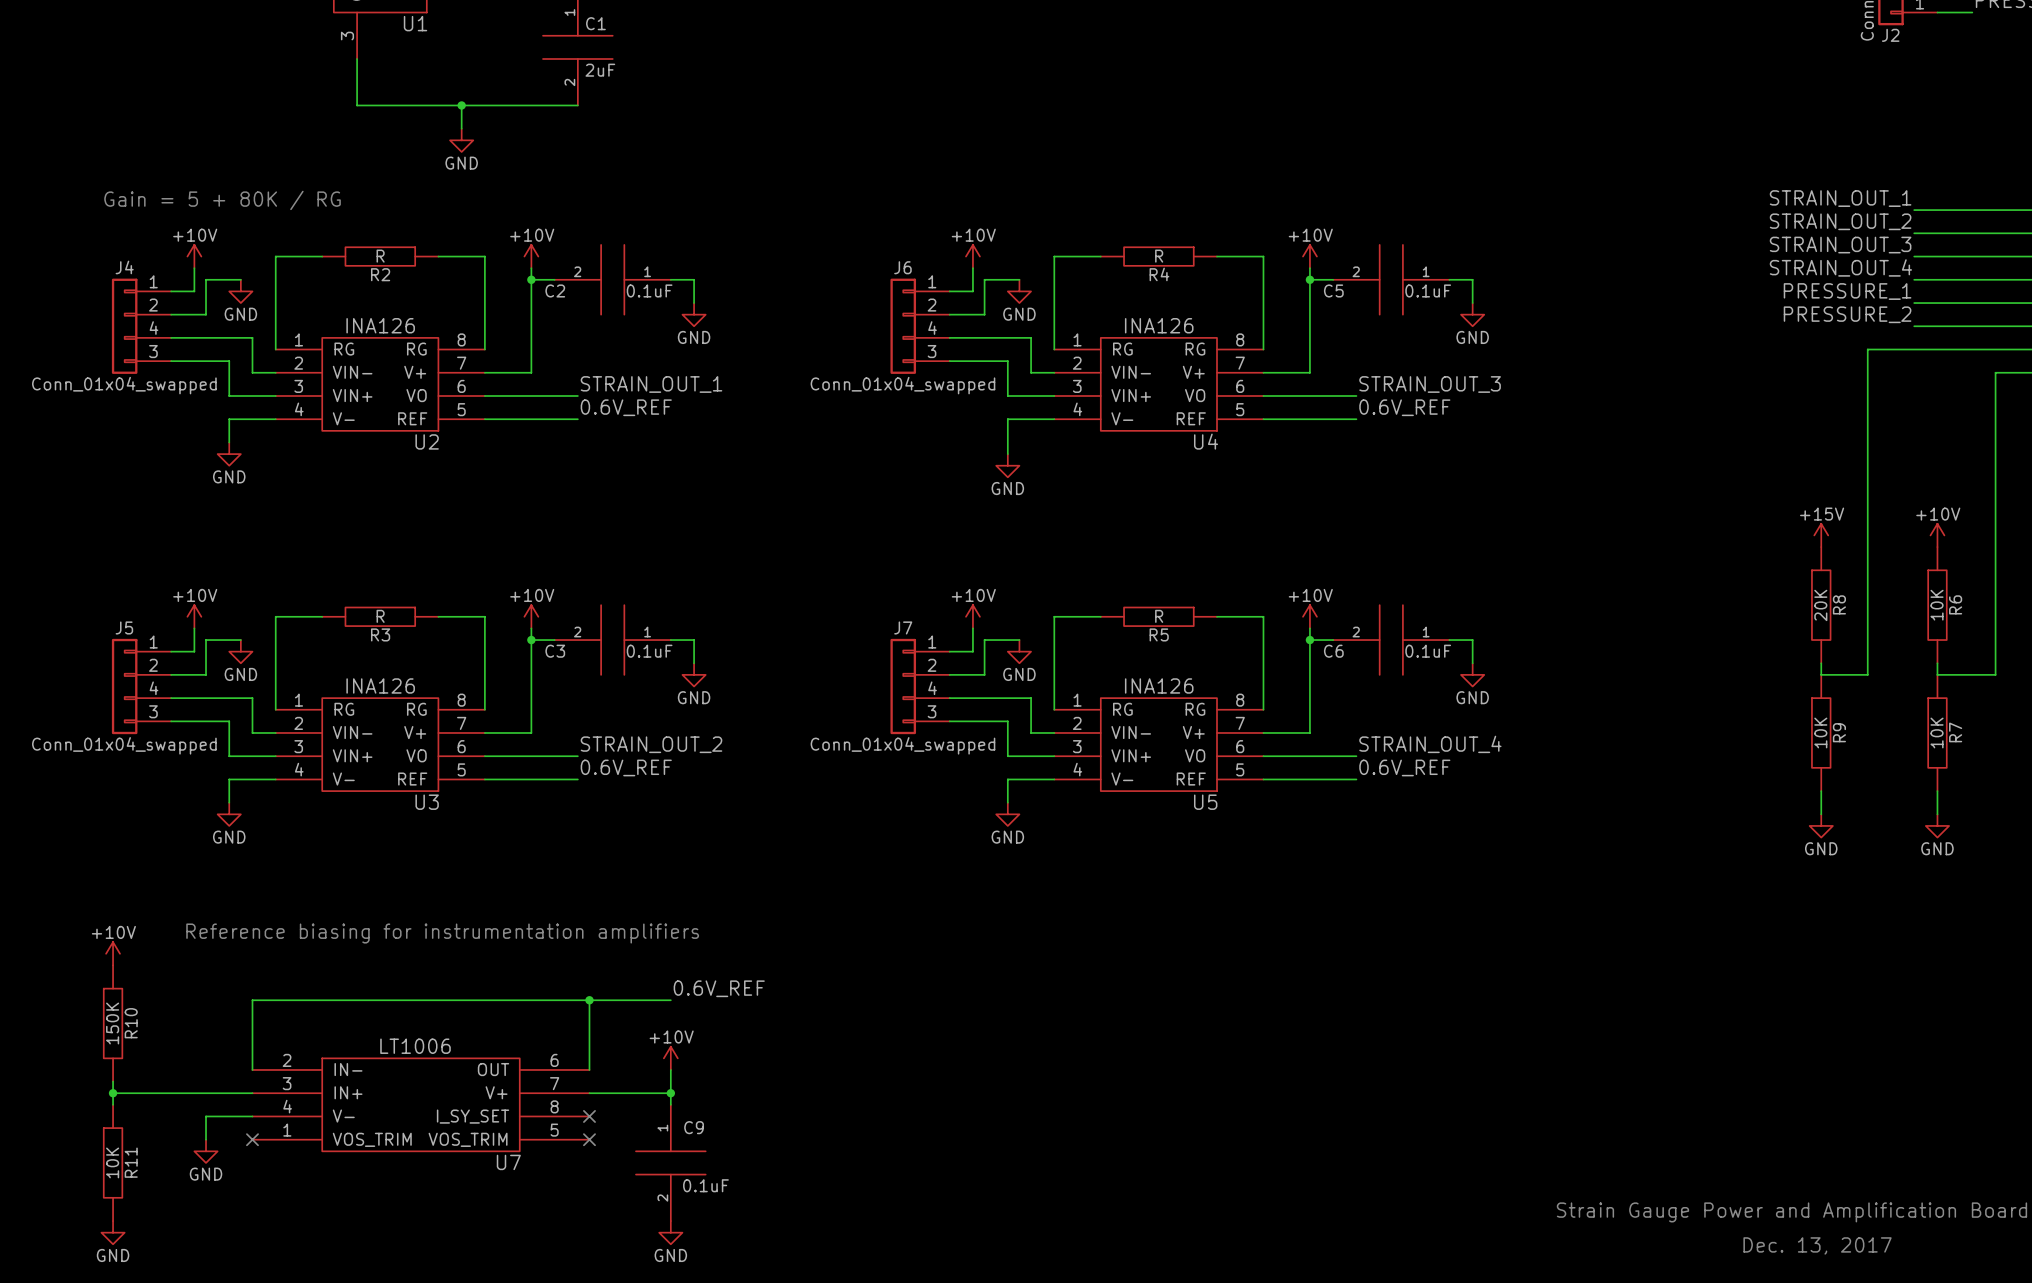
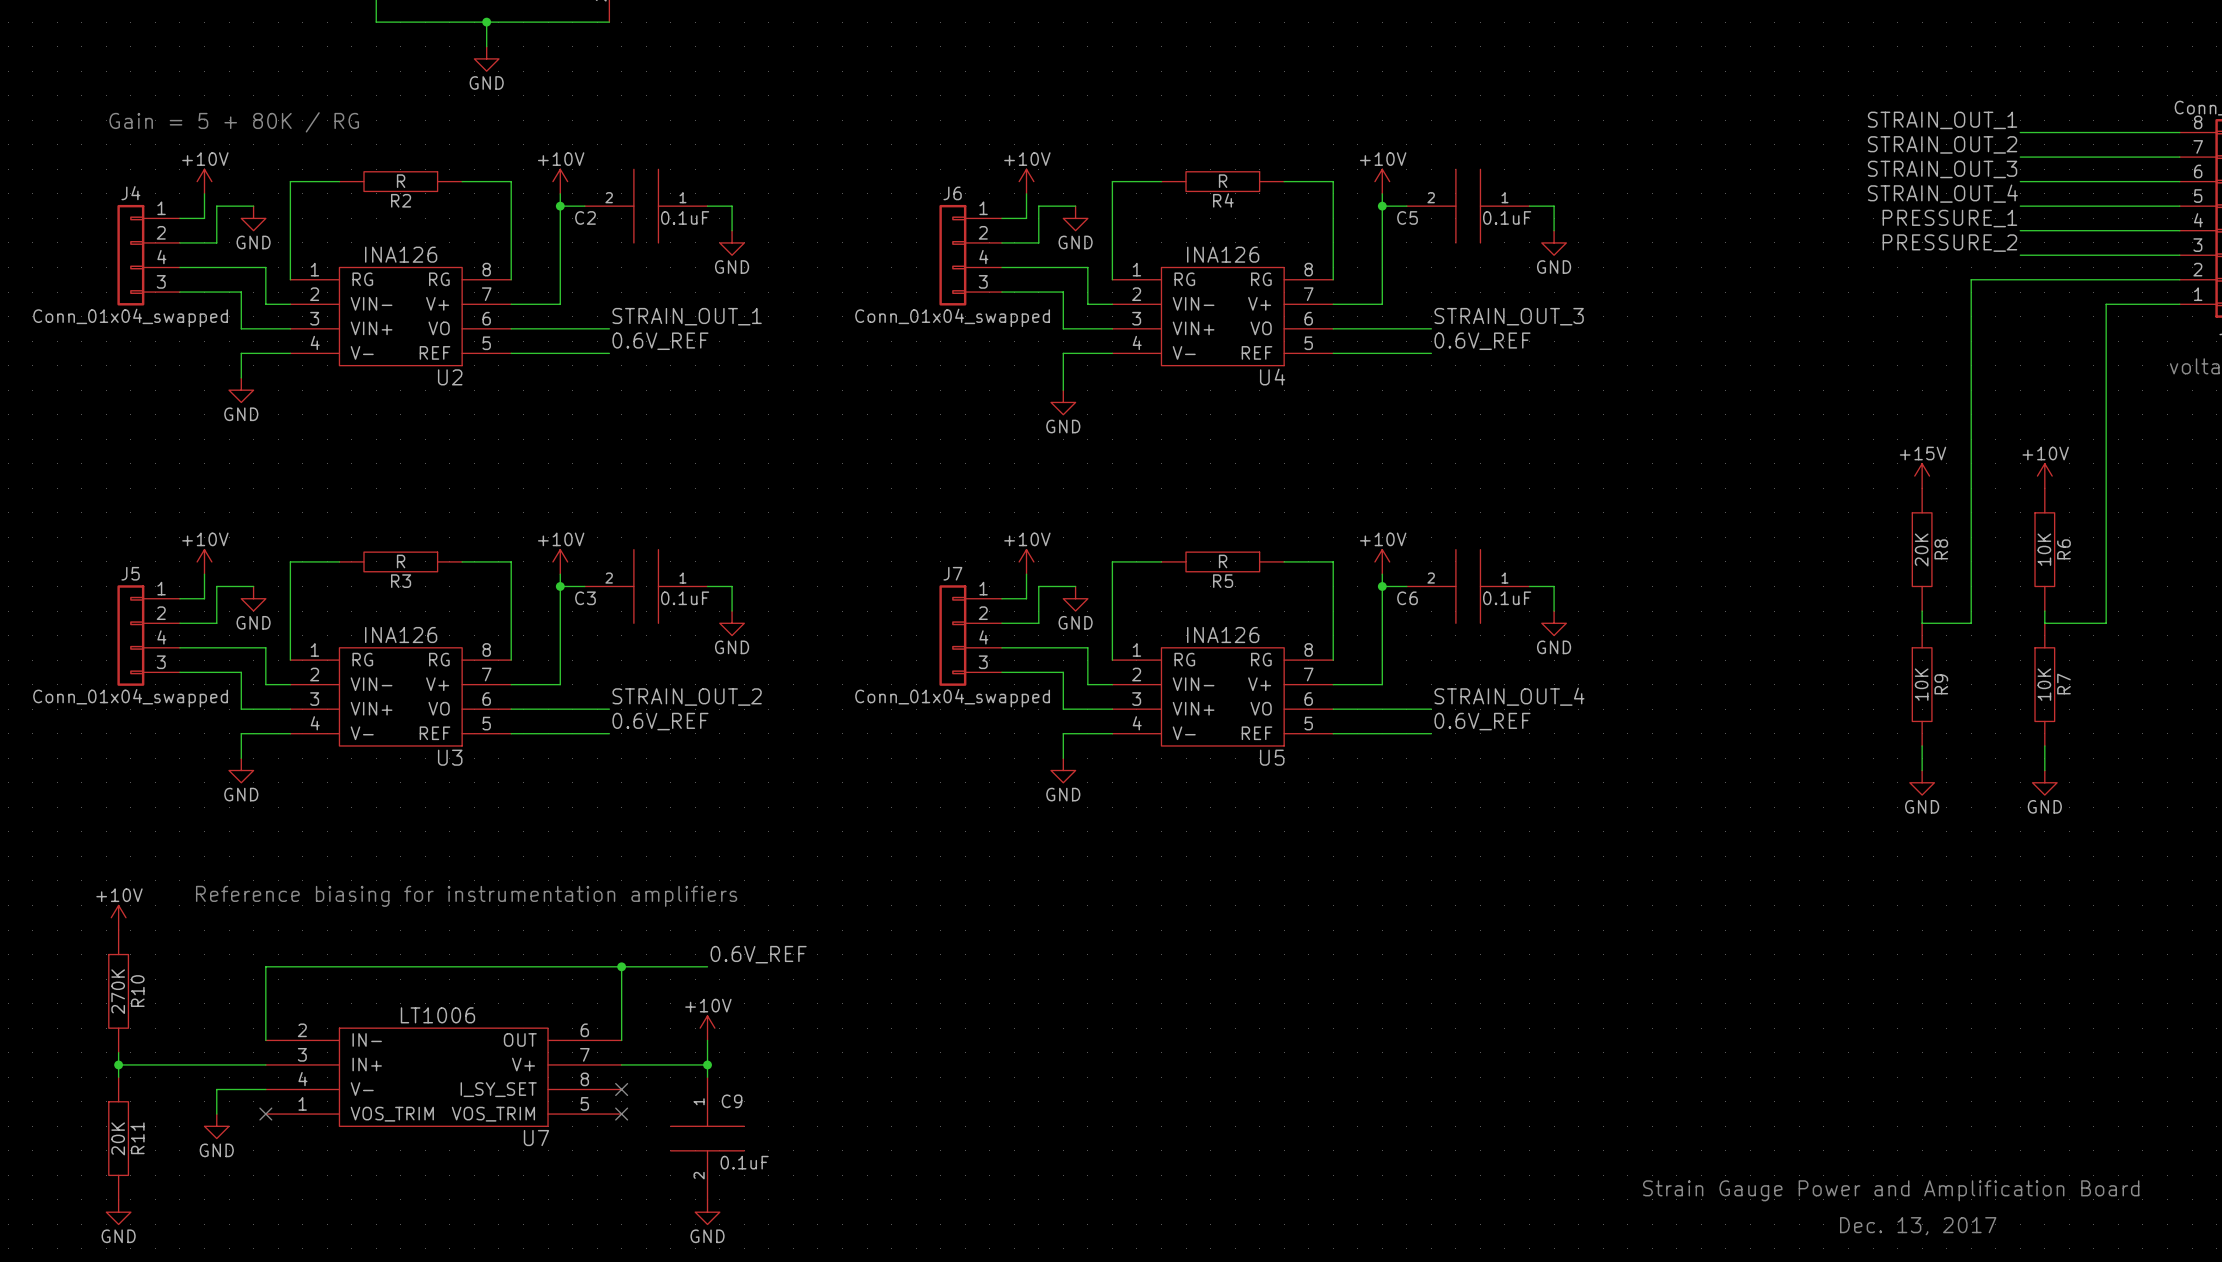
R10 value: 150K (112, 1023) -> 270K (118, 991)
R11 value: 10K (112, 1162) -> 20K (118, 1138)

